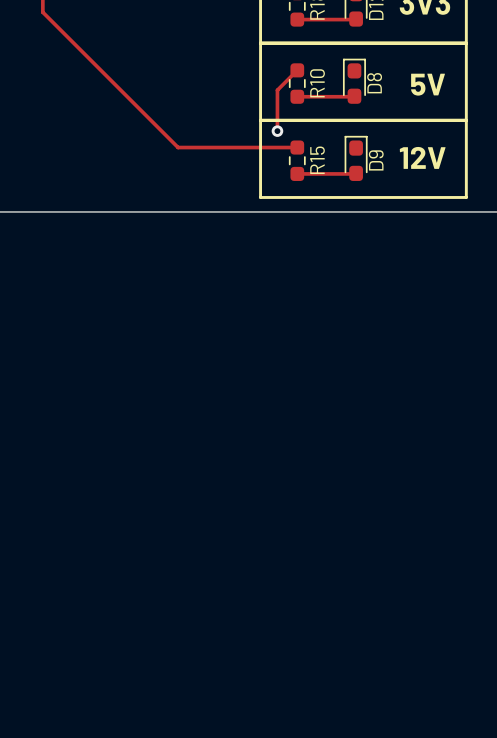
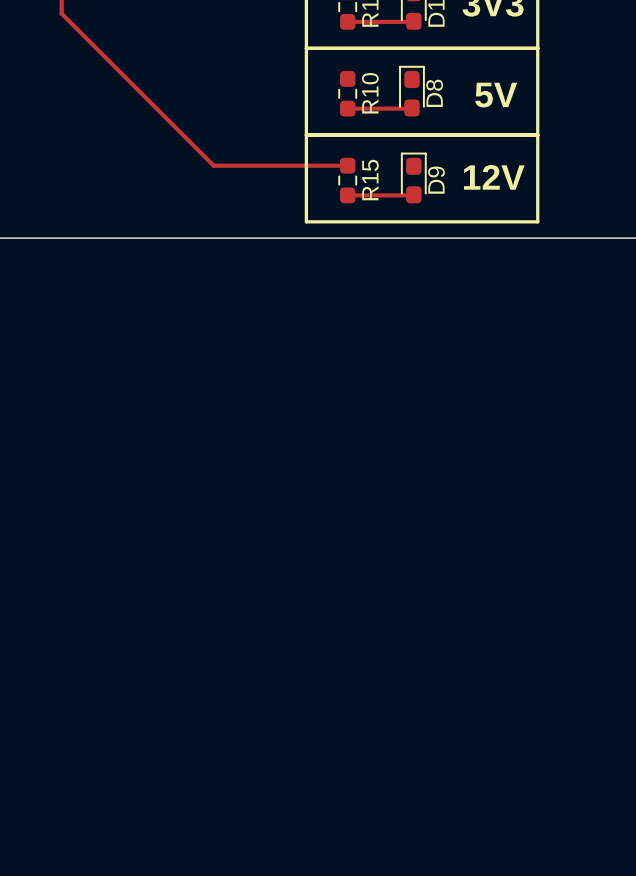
track: (297, 70) (277, 90) (277, 131) -> none
via: (277, 131) -> none

